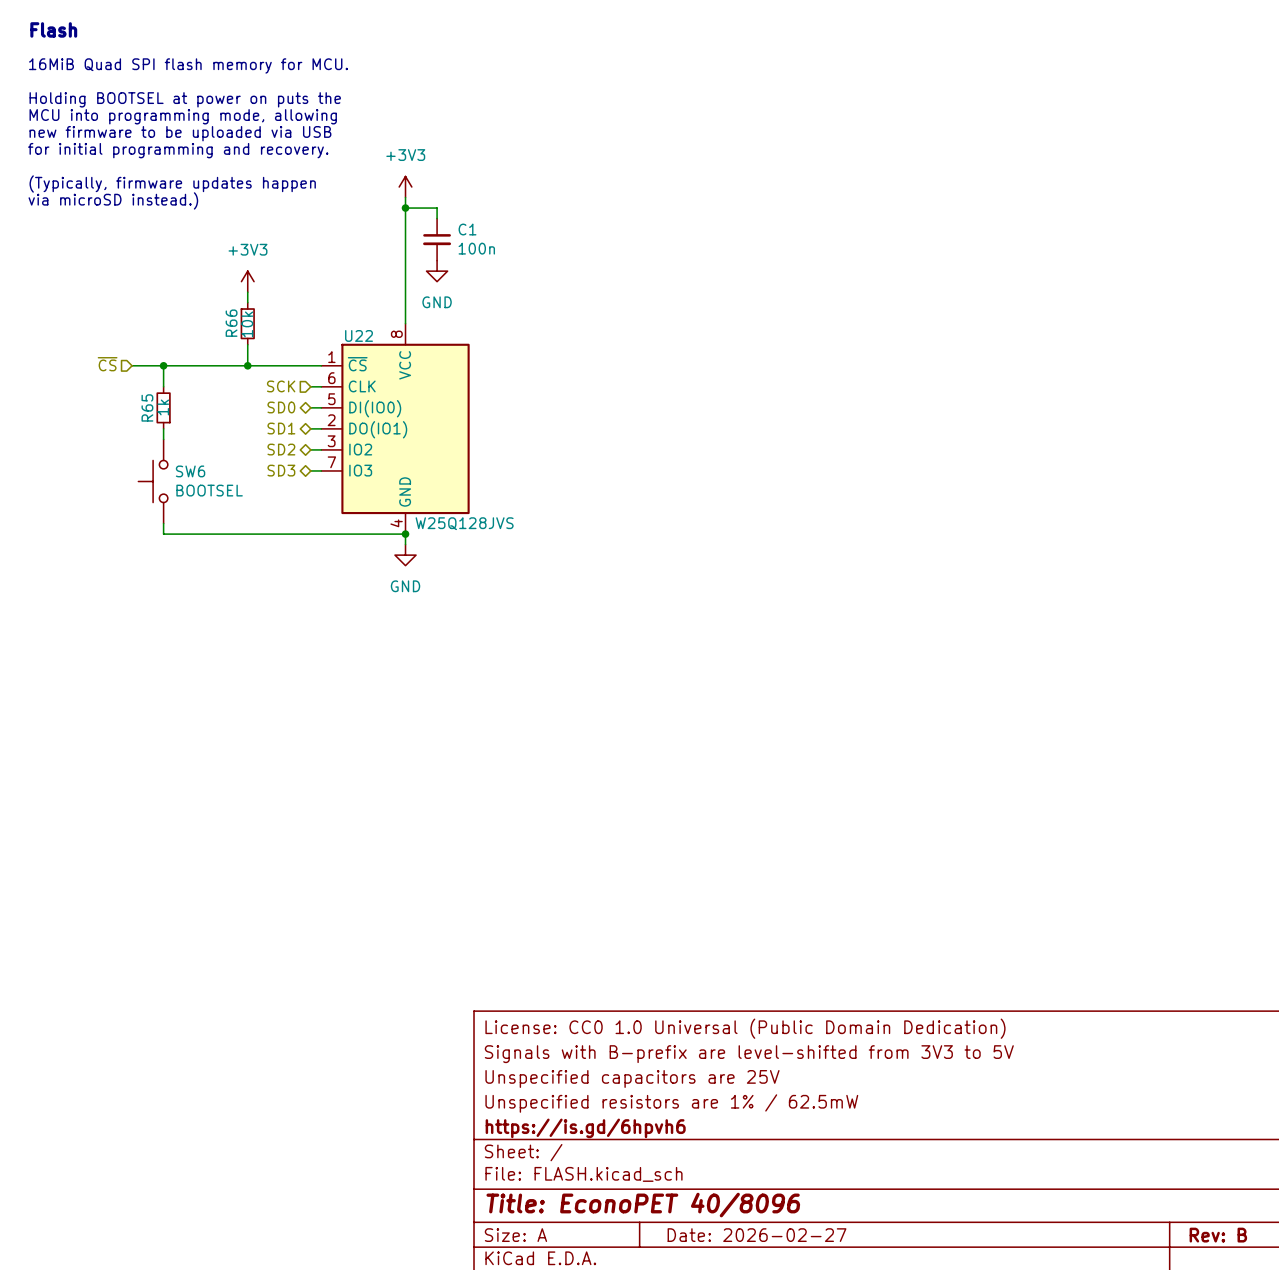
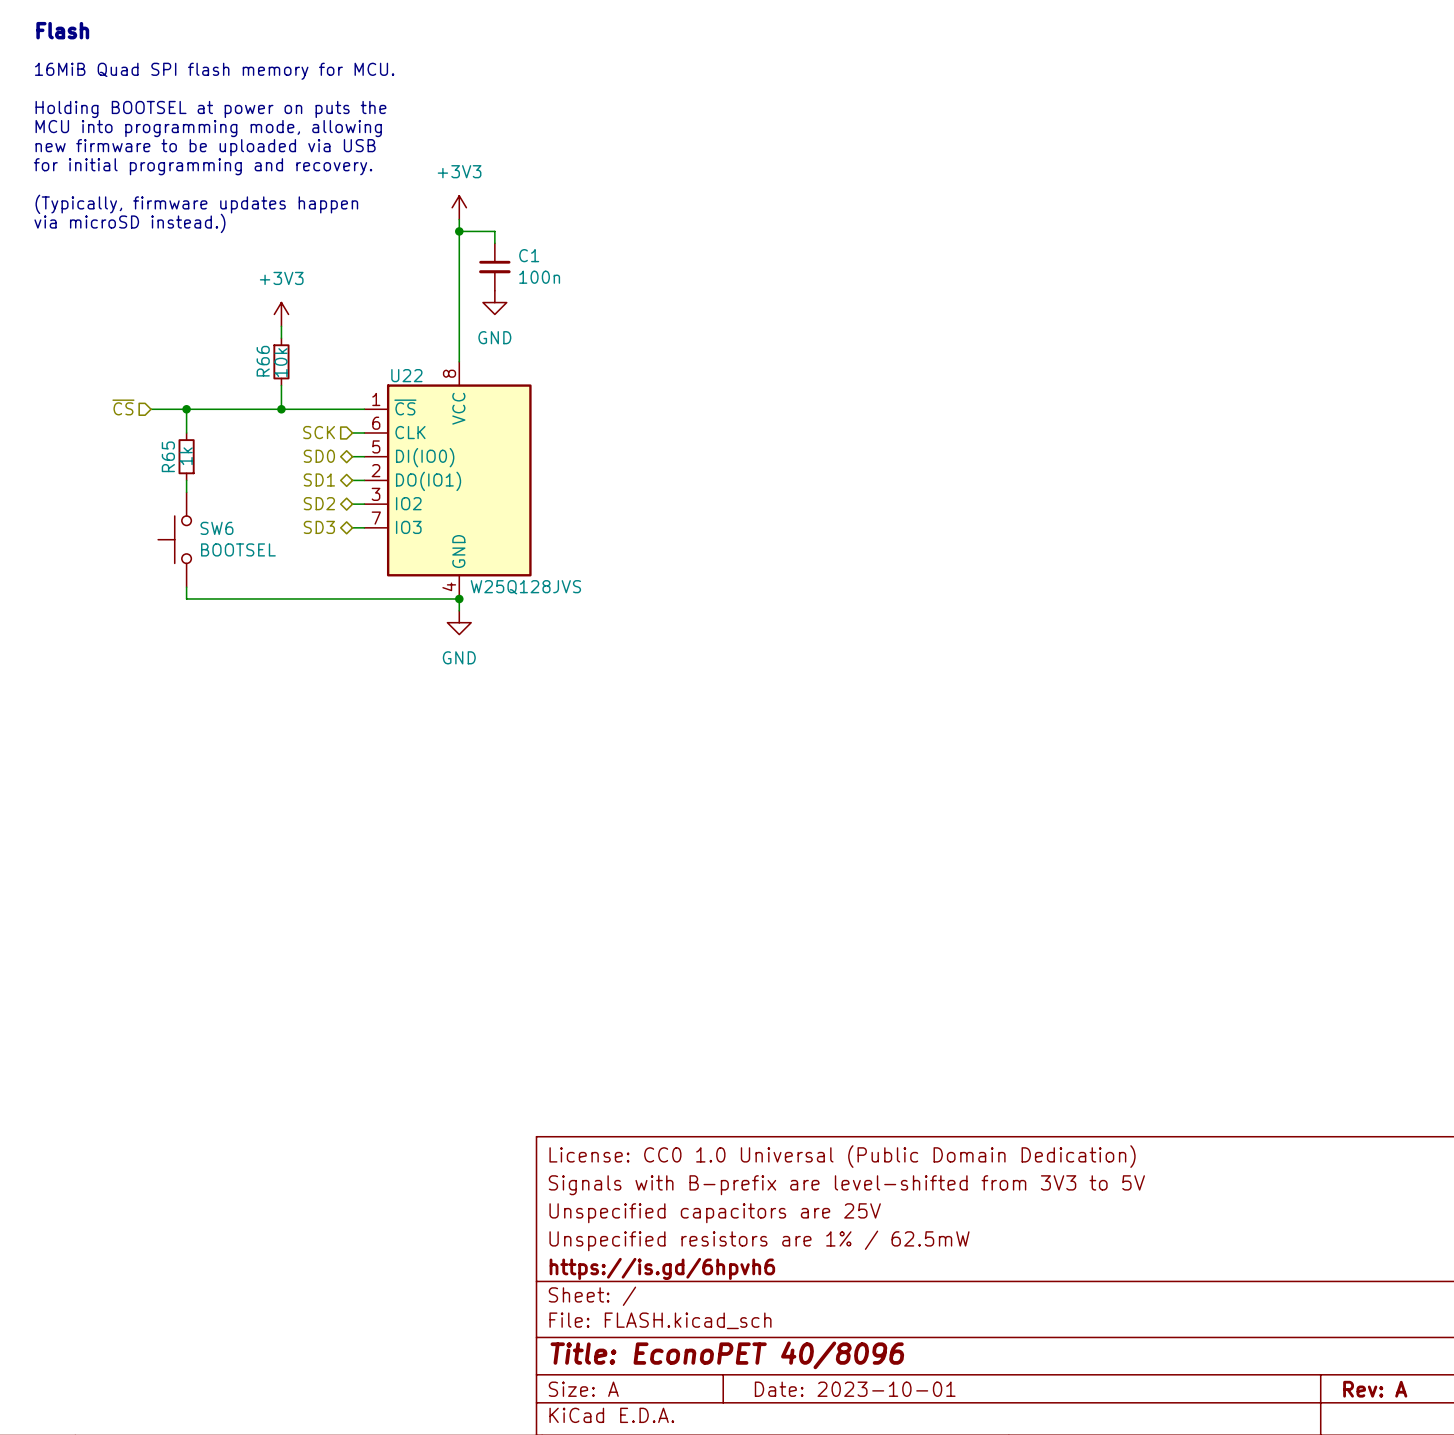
title block: Date: 2026-02-27 (757, 1235) -> Date: 2023-10-01 (855, 1389)
title block: Rev: B (1218, 1235) -> Rev: A (1375, 1389)

